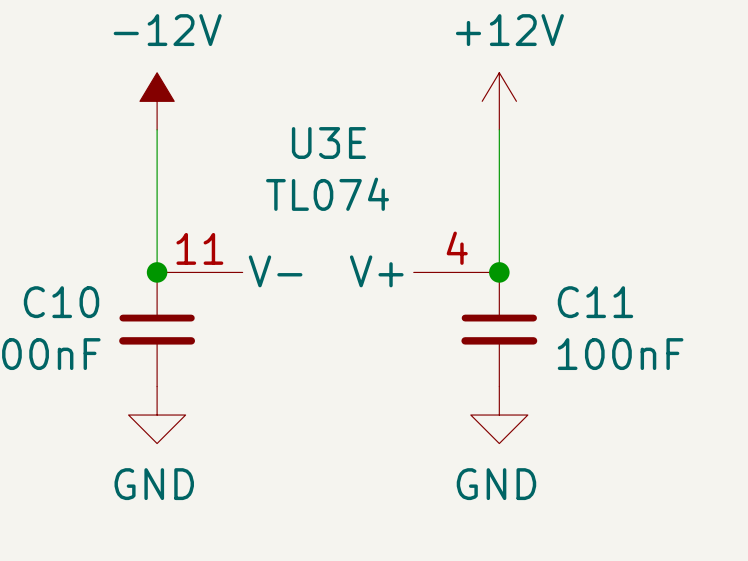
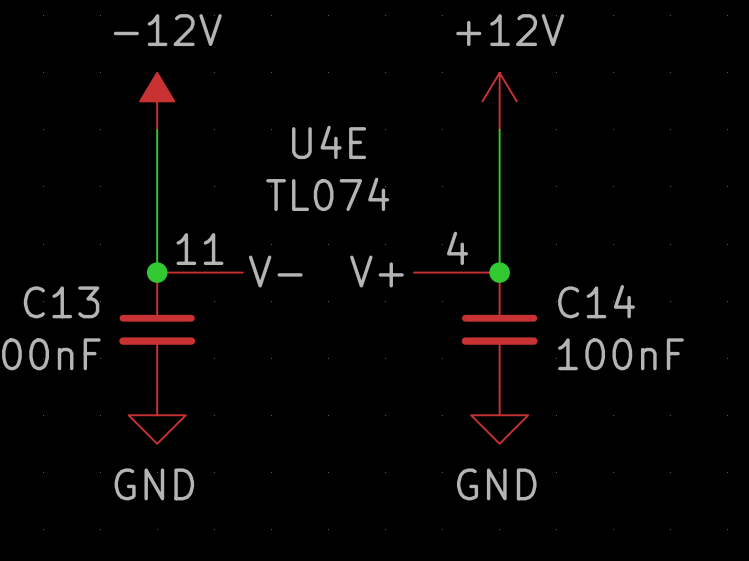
U3E name: U3E (328, 143) -> U4E (329, 142)
C10 name: C10 (61, 302) -> C13 (61, 302)
C11 name: C11 (595, 302) -> C14 (596, 301)

